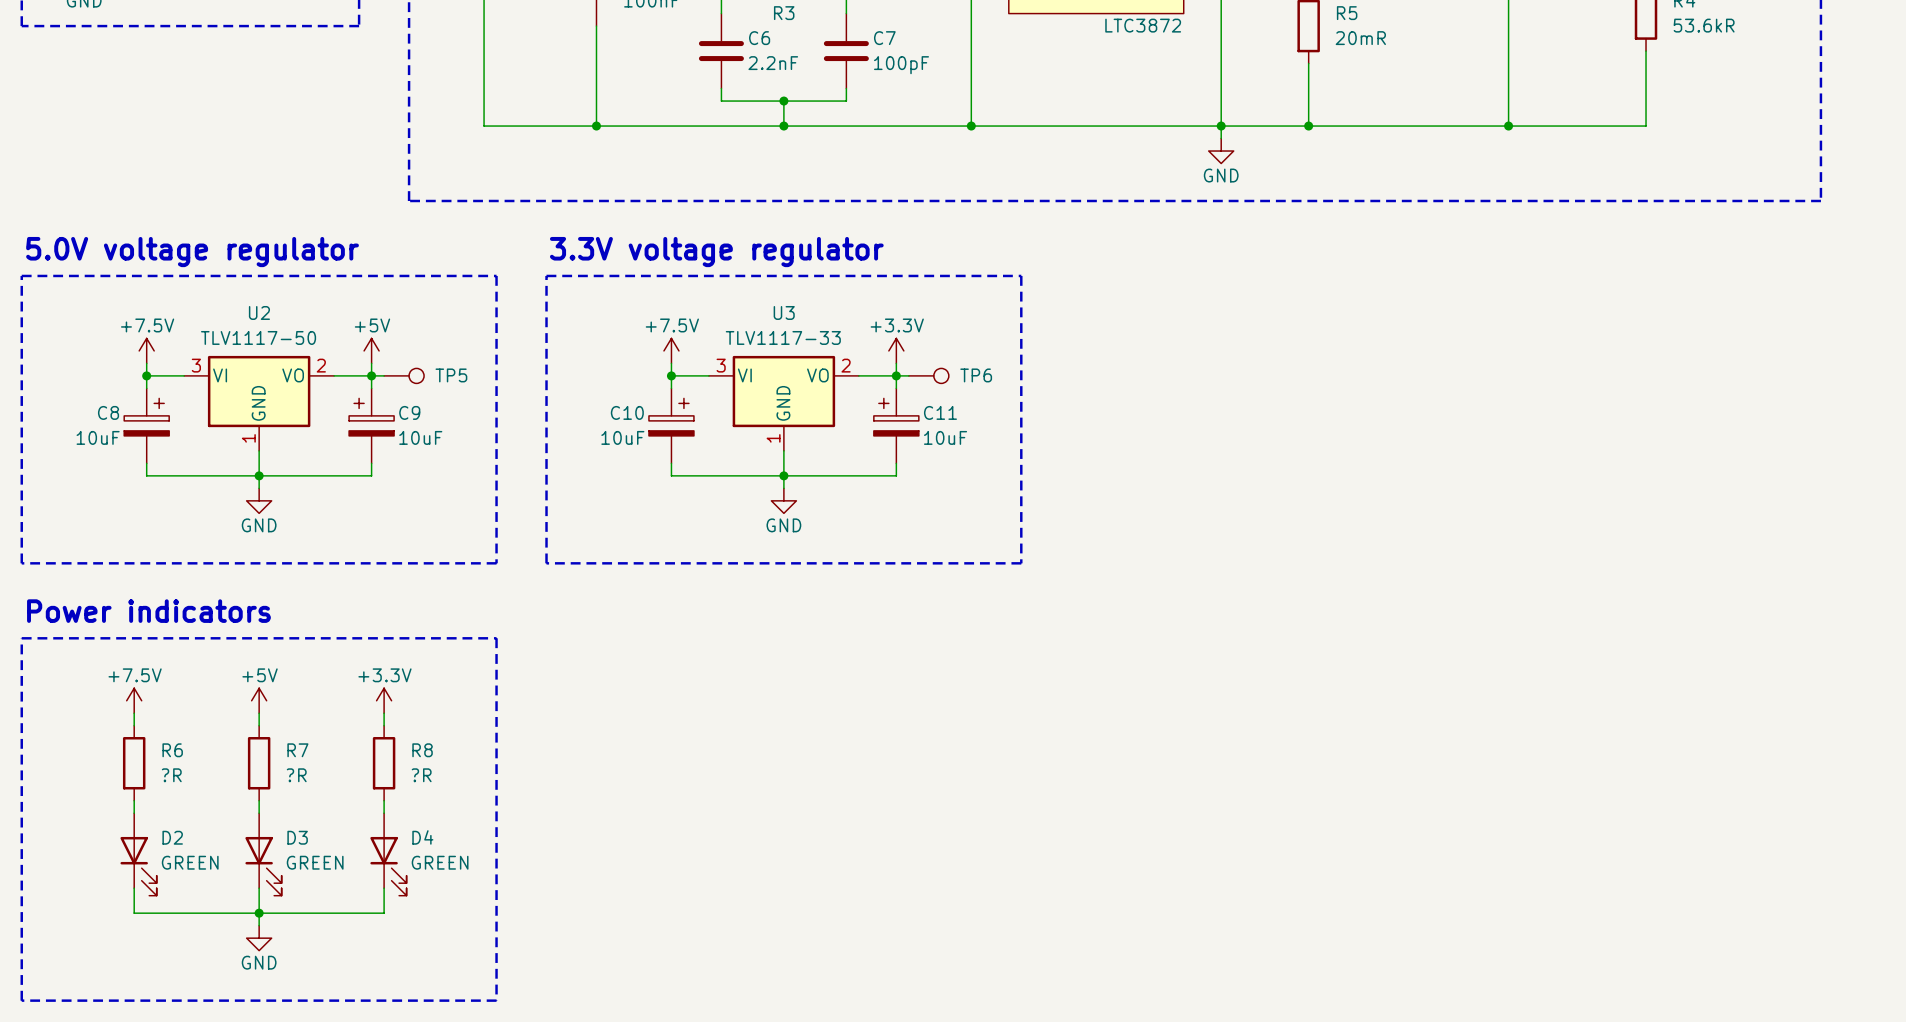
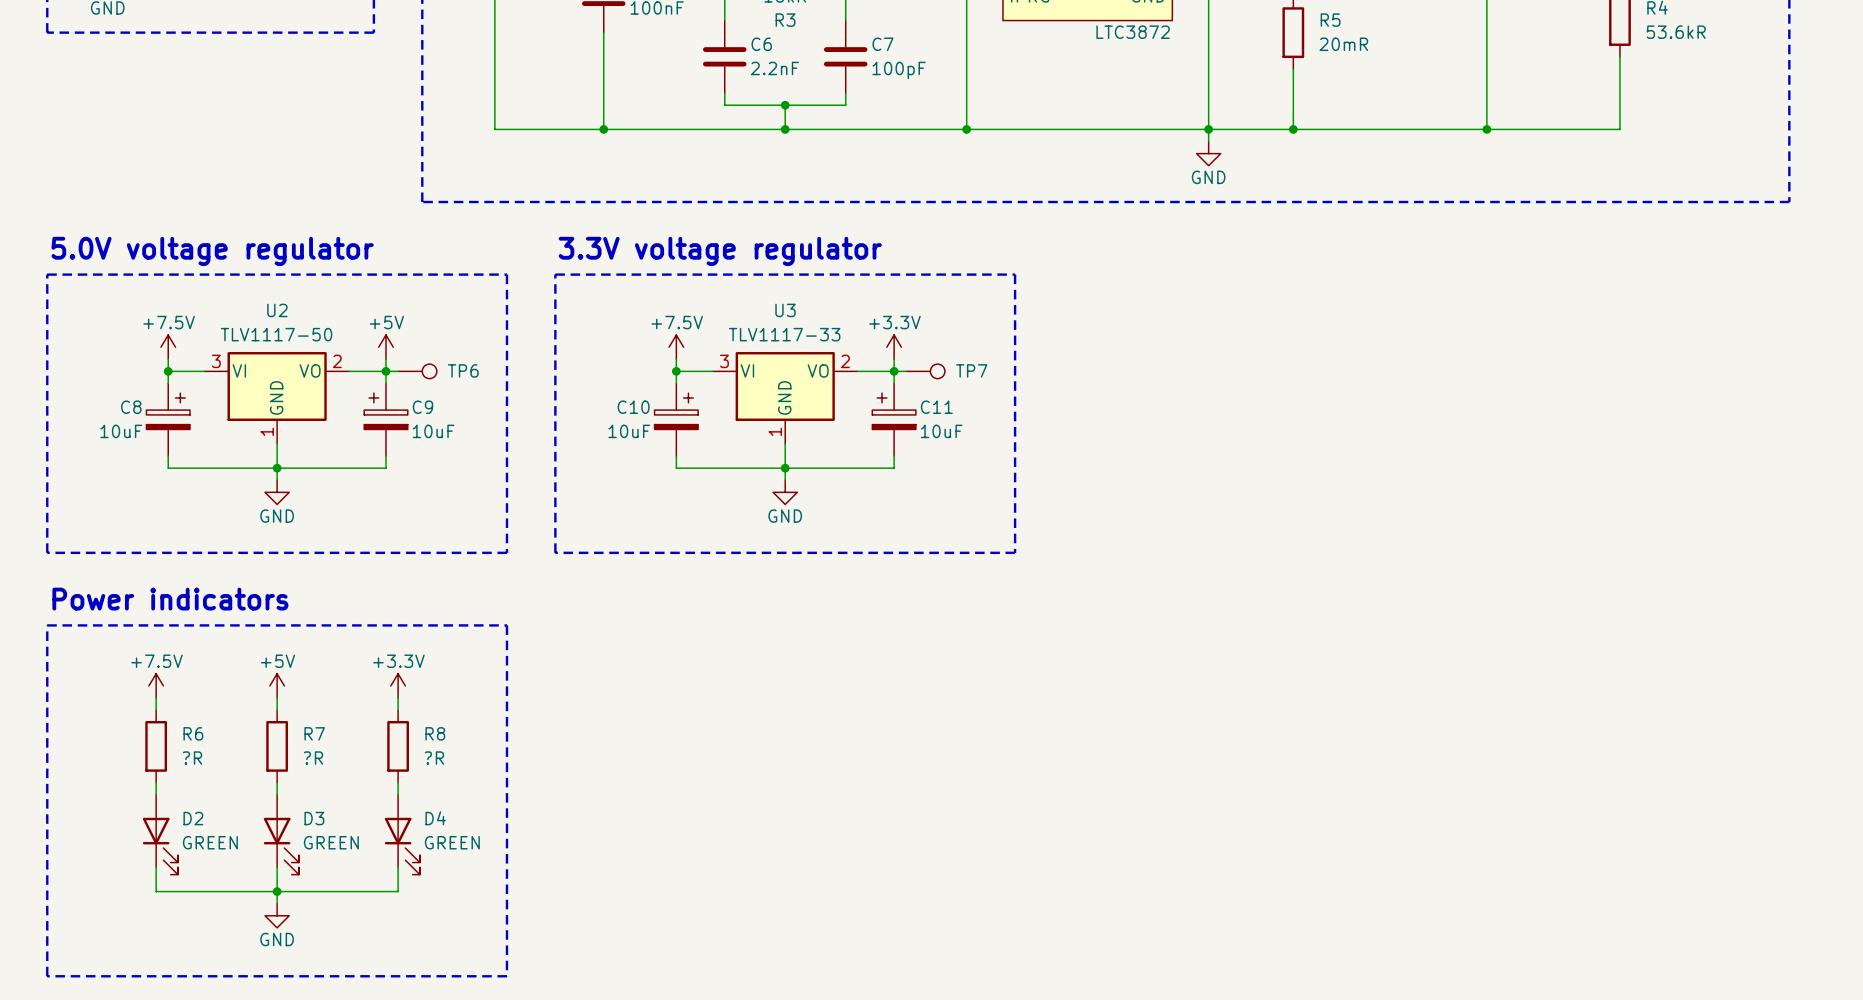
TP5 name: TP5 (451, 375) -> TP6 (463, 370)
TP6 name: TP6 (976, 375) -> TP7 (971, 370)

